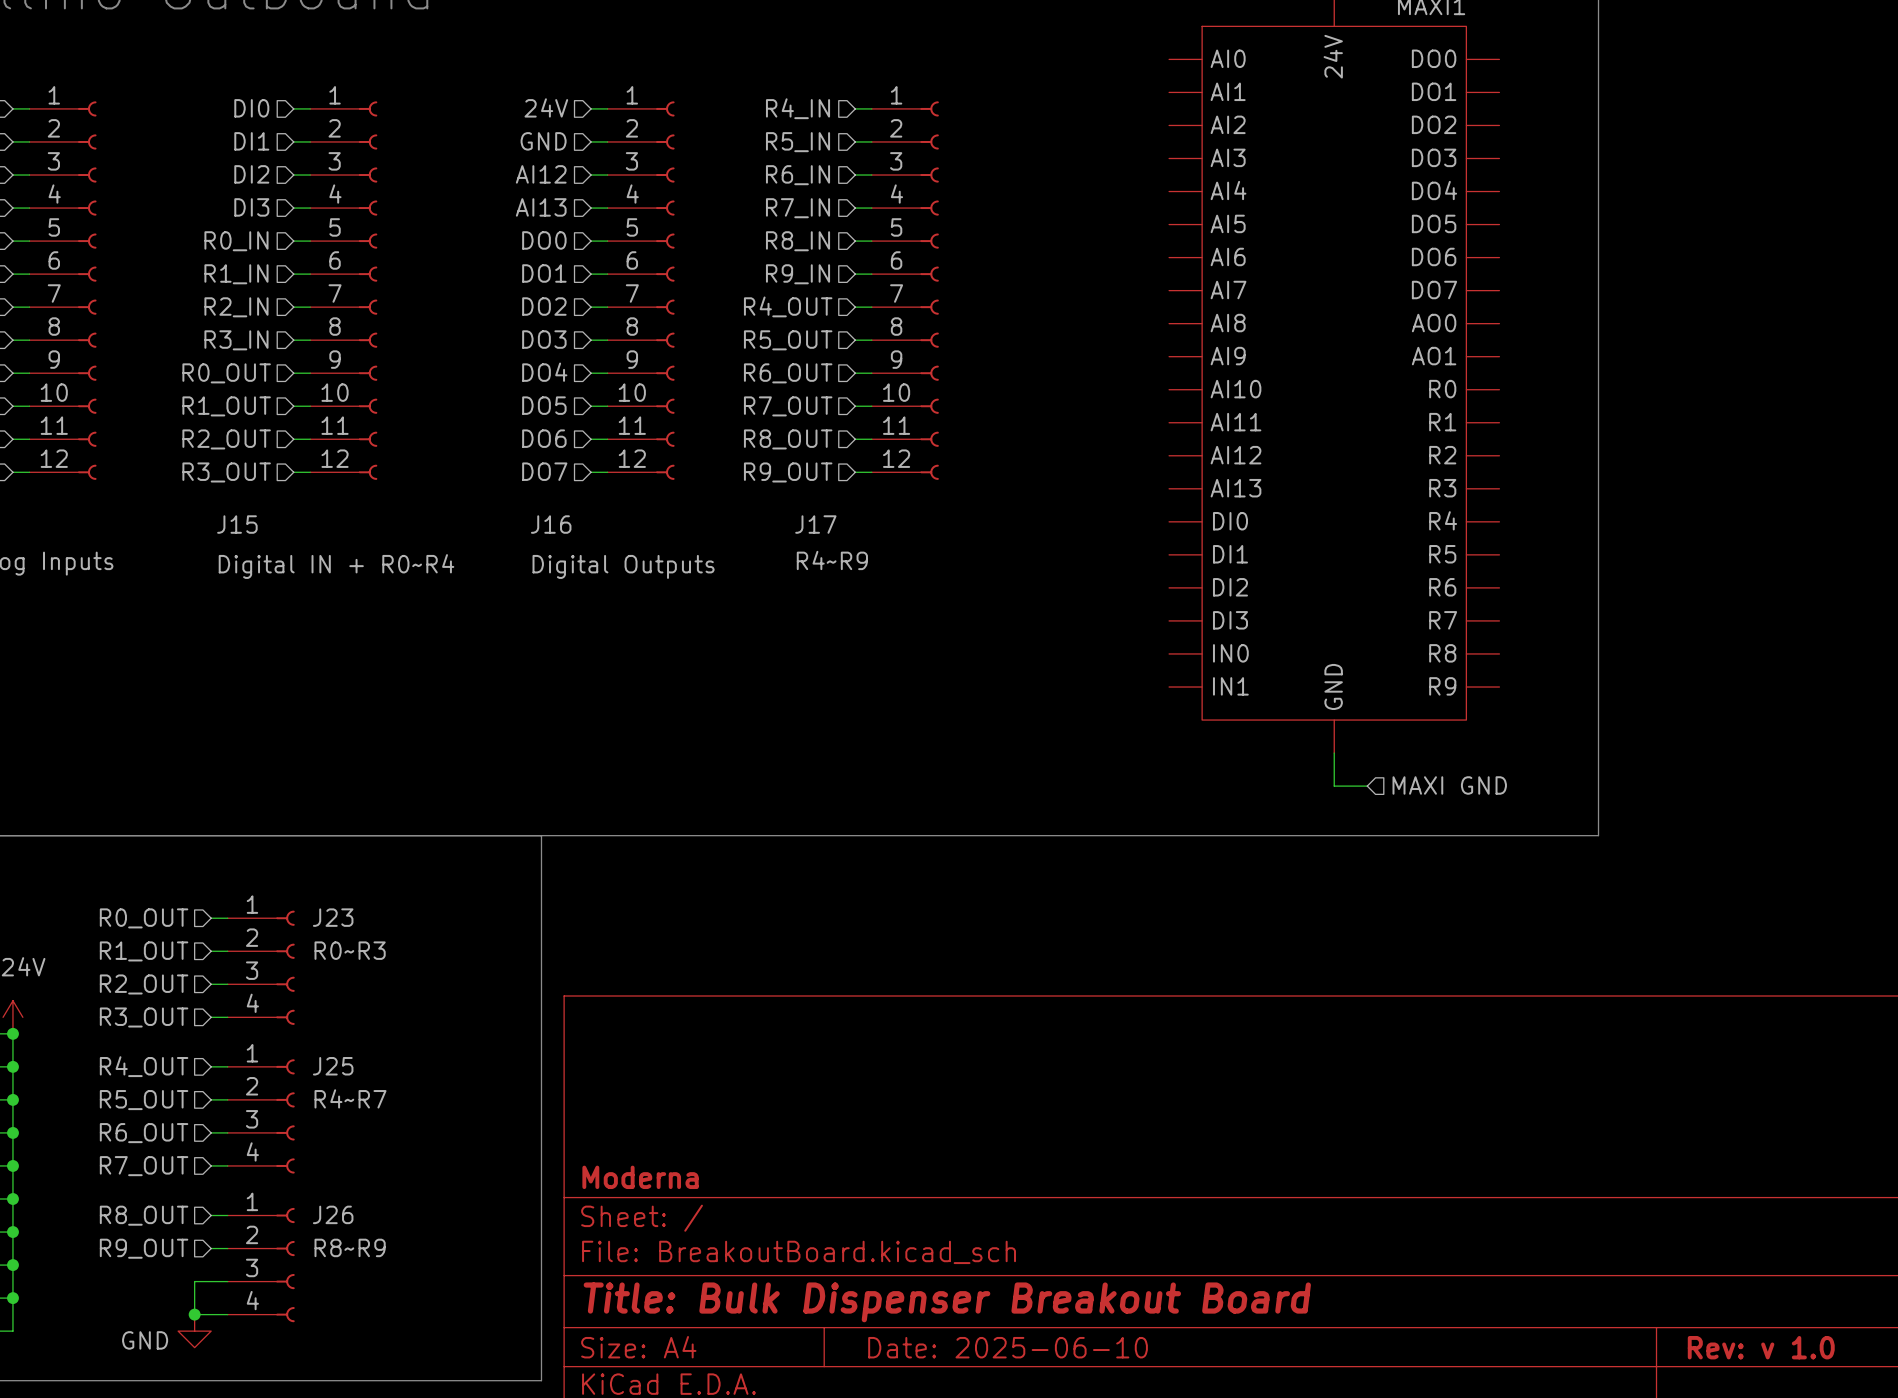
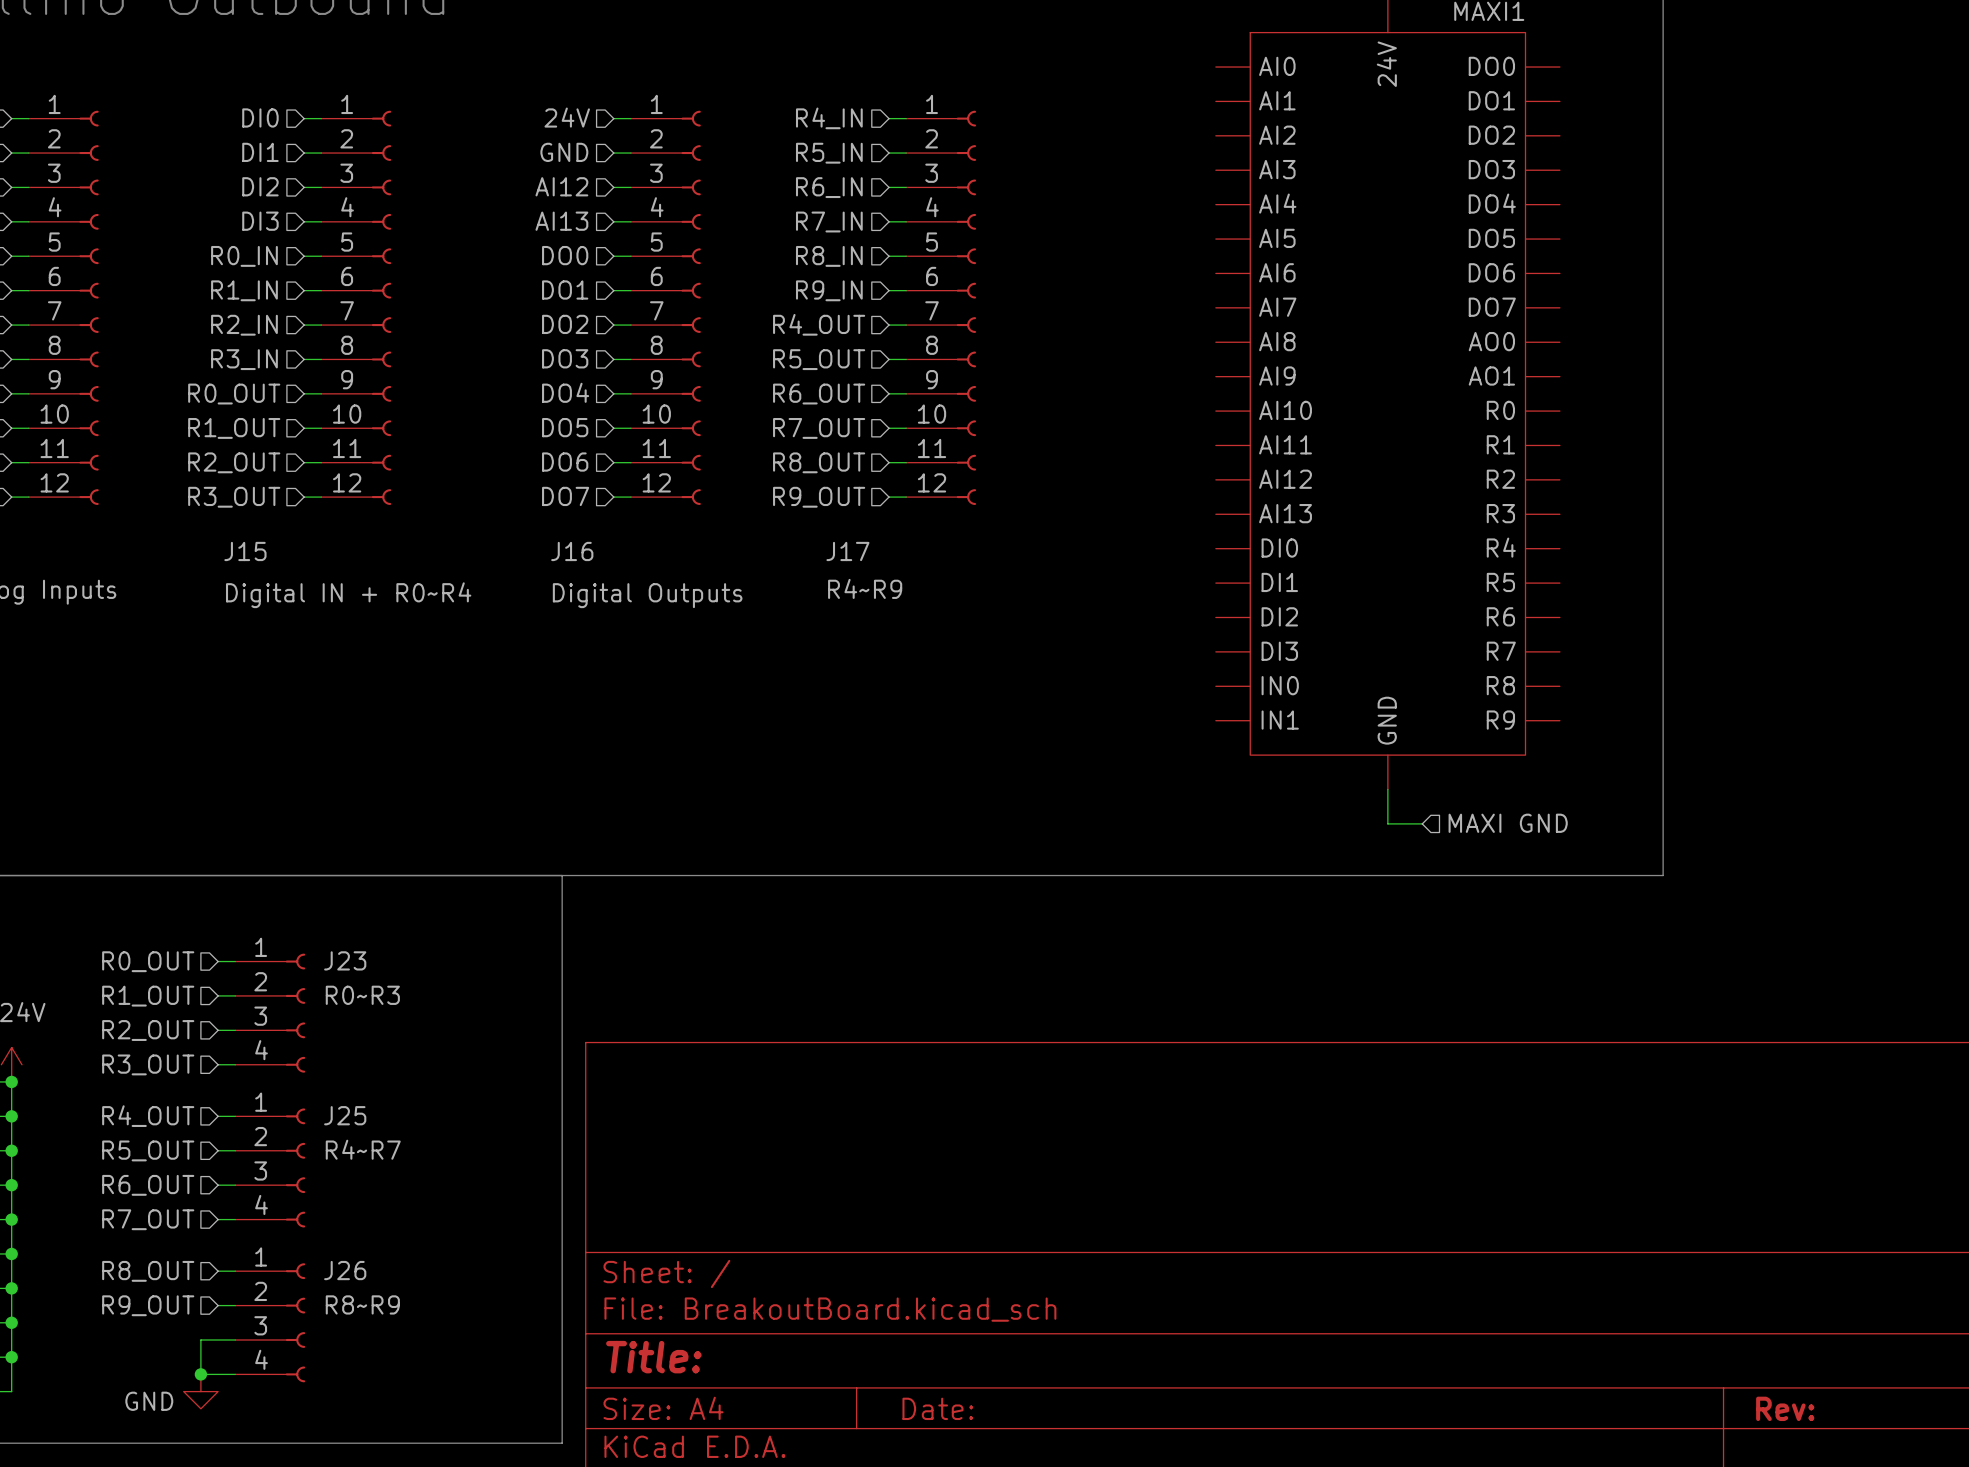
title block: Moderna (640, 1177) -> none
title block: Title: Bulk Dispenser Breakout Board (947, 1302) -> Title: (653, 1357)
title block: Date: 2025-06-10 (1008, 1347) -> Date: (937, 1408)
title block: Rev: v 1.0 (1761, 1347) -> Rev: (1785, 1408)

